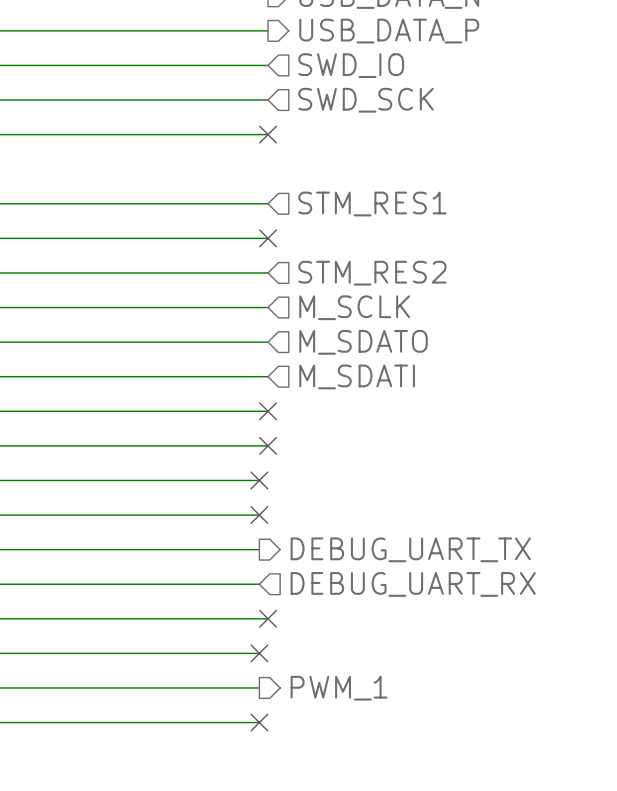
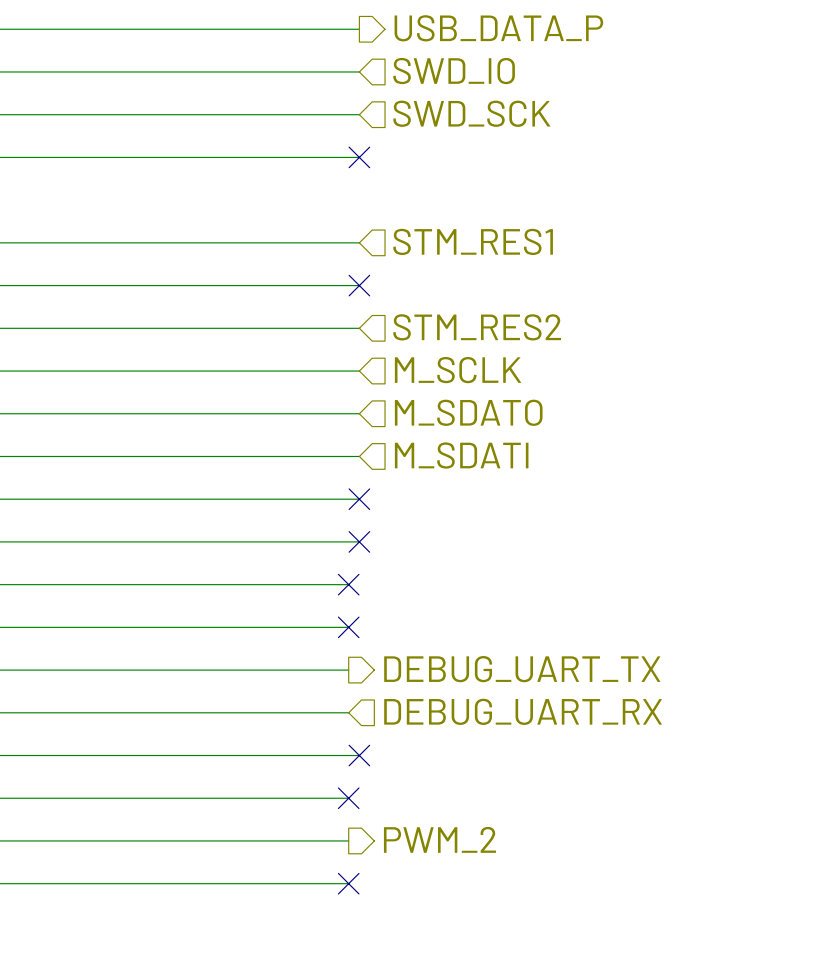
hierarchical label: PWM_1 (339, 688) -> PWM_2 (439, 839)

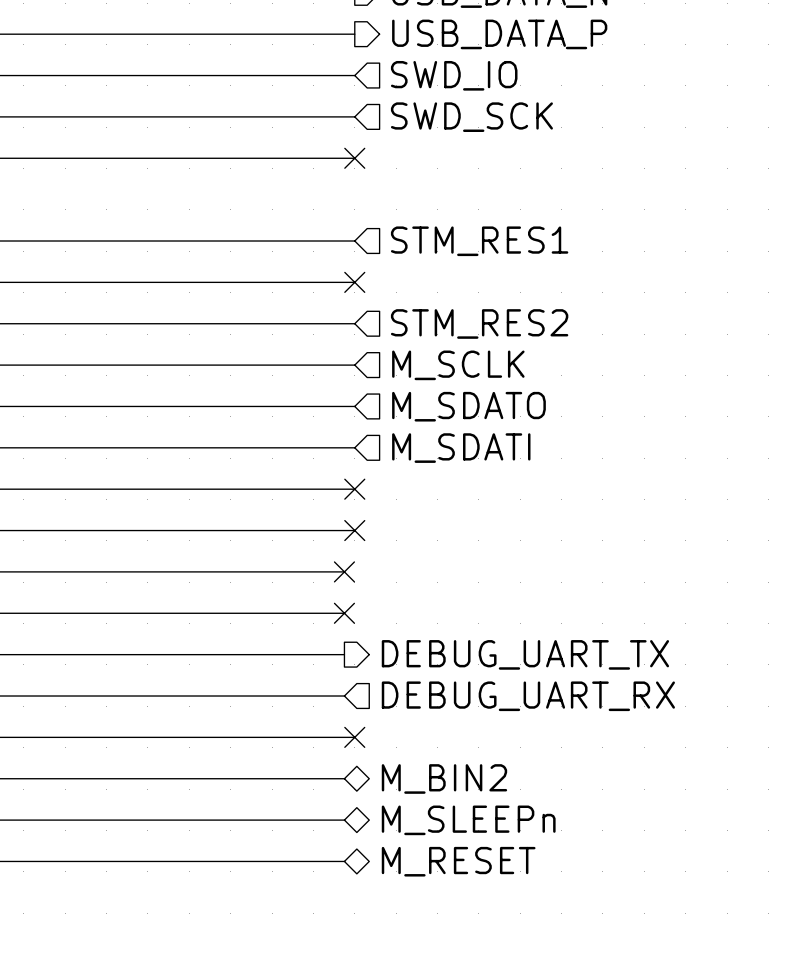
hierarchical label: none -> M_BIN2 (444, 778)
no-connect mark: (348, 798) -> none
hierarchical label shape: output (439, 839) -> bidirectional (468, 820)
hierarchical label: PWM_2 (439, 839) -> M_SLEEPn (468, 820)
hierarchical label: none -> M_RESET (458, 861)
no-connect mark: (348, 883) -> none

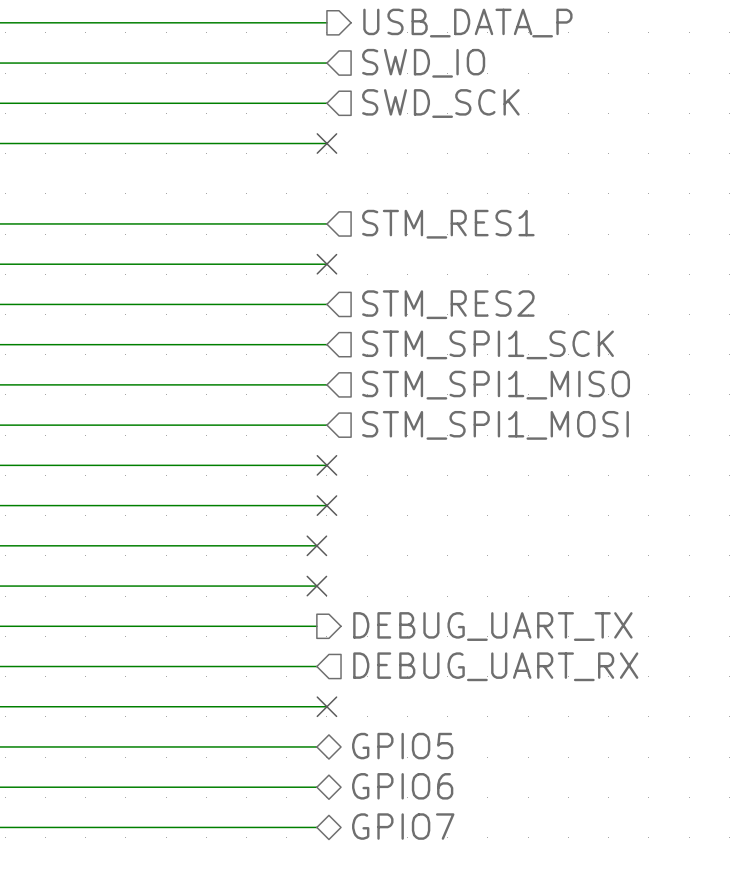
hierarchical label: M_SCLK (458, 365) -> STM_SPI1_SCK (488, 344)
hierarchical label: M_SDATO (468, 406) -> STM_SPI1_MISO (496, 385)
hierarchical label: M_SDATI (461, 448) -> STM_SPI1_MOSI (495, 425)
hierarchical label: M_BIN2 (444, 778) -> GPIO5 (402, 746)
hierarchical label: M_SLEEPn (468, 820) -> GPIO6 (402, 786)
hierarchical label: M_RESET (458, 861) -> GPIO7 (403, 826)

